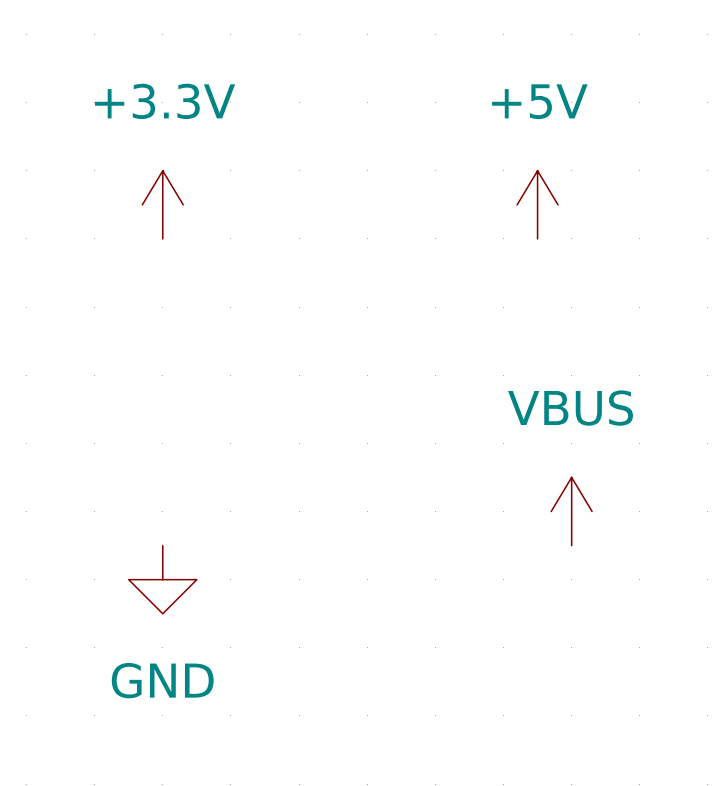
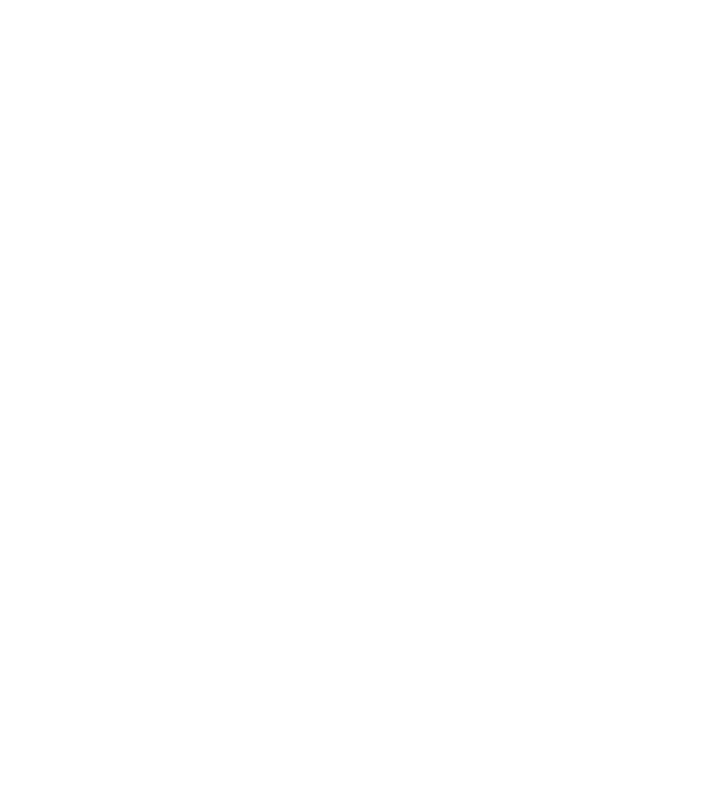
power symbol: +3.3V (162, 204) -> none
power symbol: +5V (537, 204) -> none
power symbol: VBUS (571, 511) -> none
power symbol: GND (162, 579) -> none

